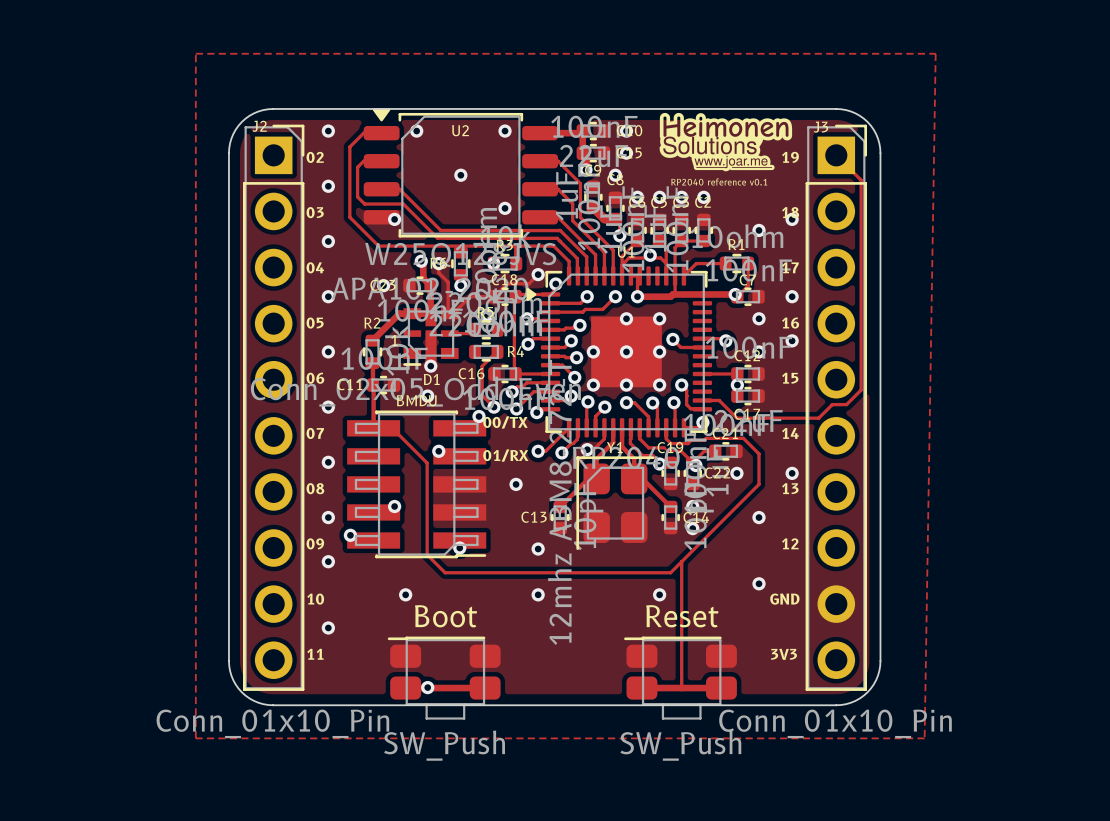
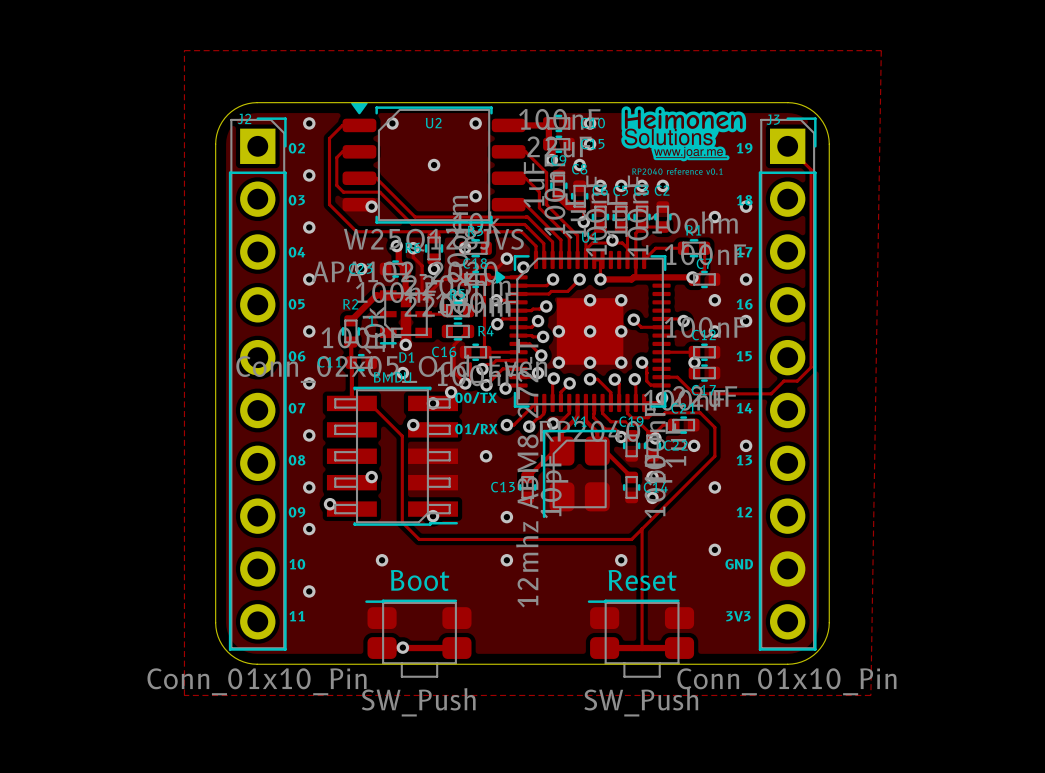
track: none -> (470, 363) (470, 381)
via: none -> (433, 403)

